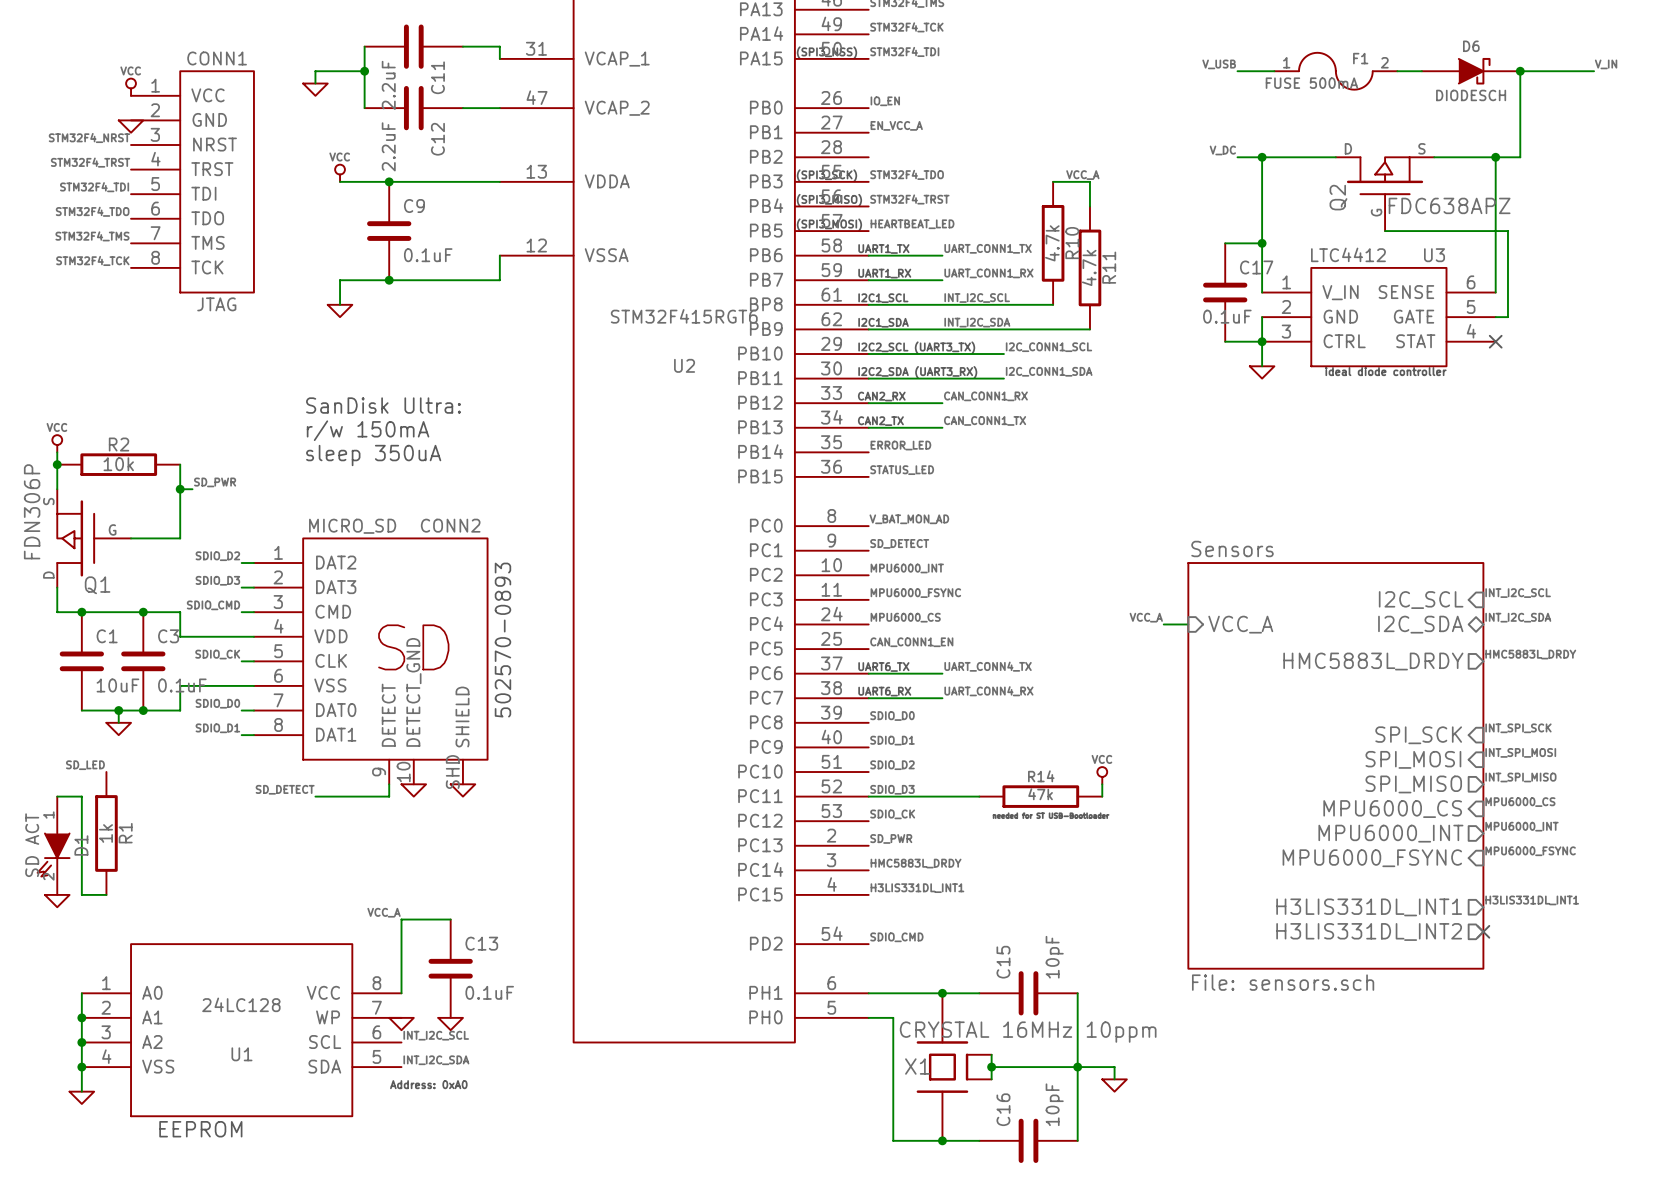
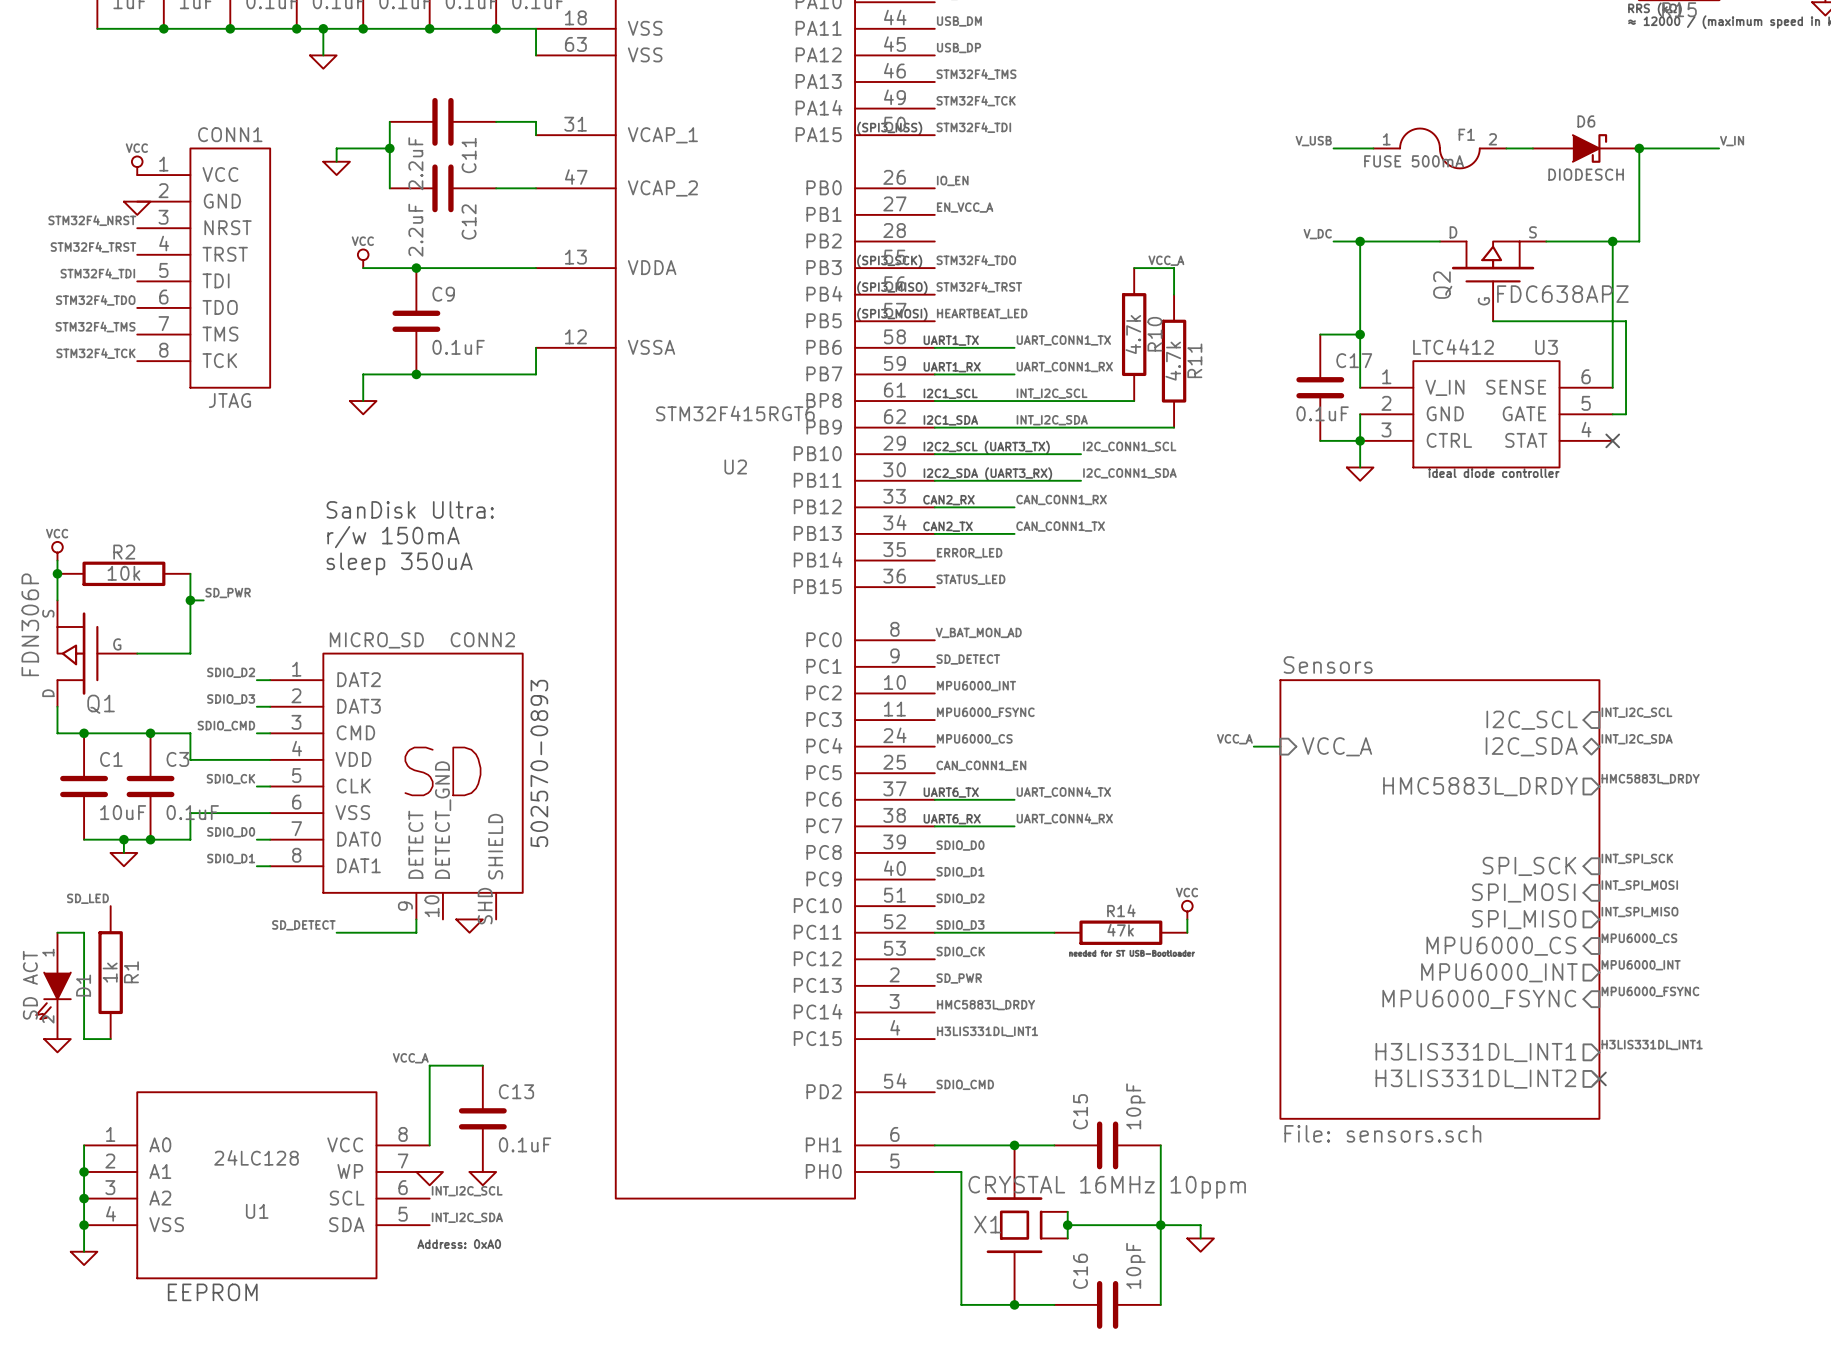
power symbol: (413, 790) -> none
power symbol: none -> (469, 926)
power symbol: (462, 790) -> none

